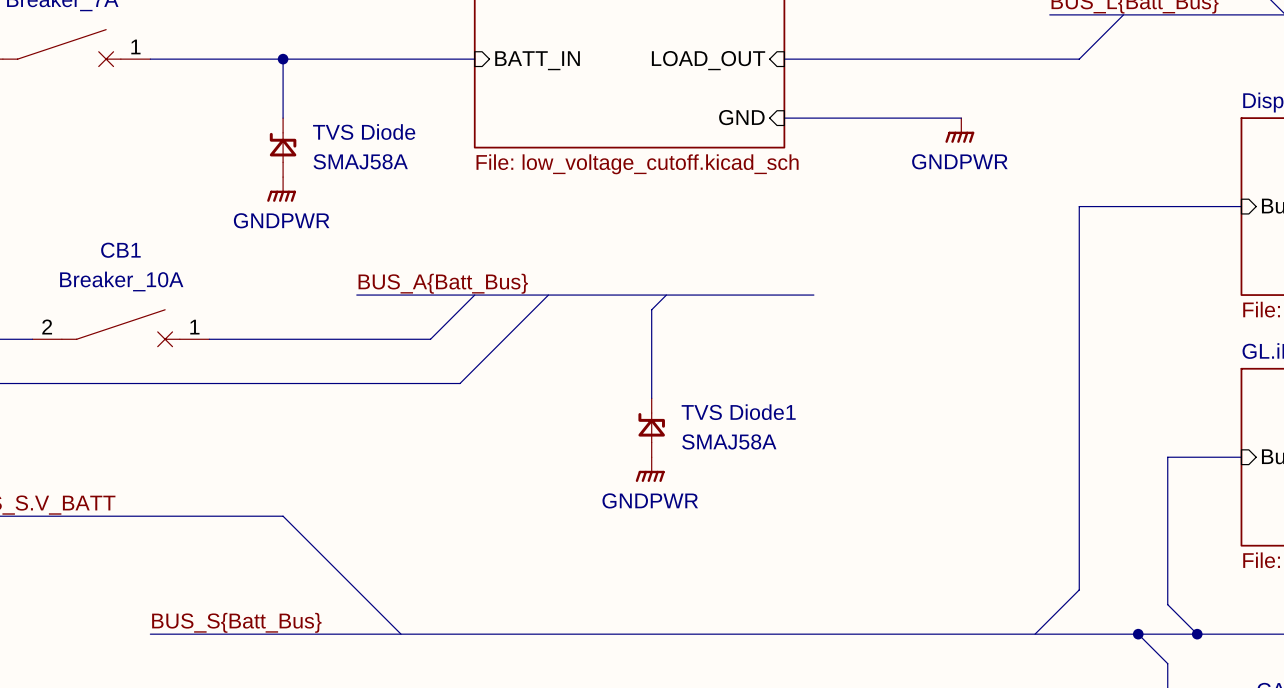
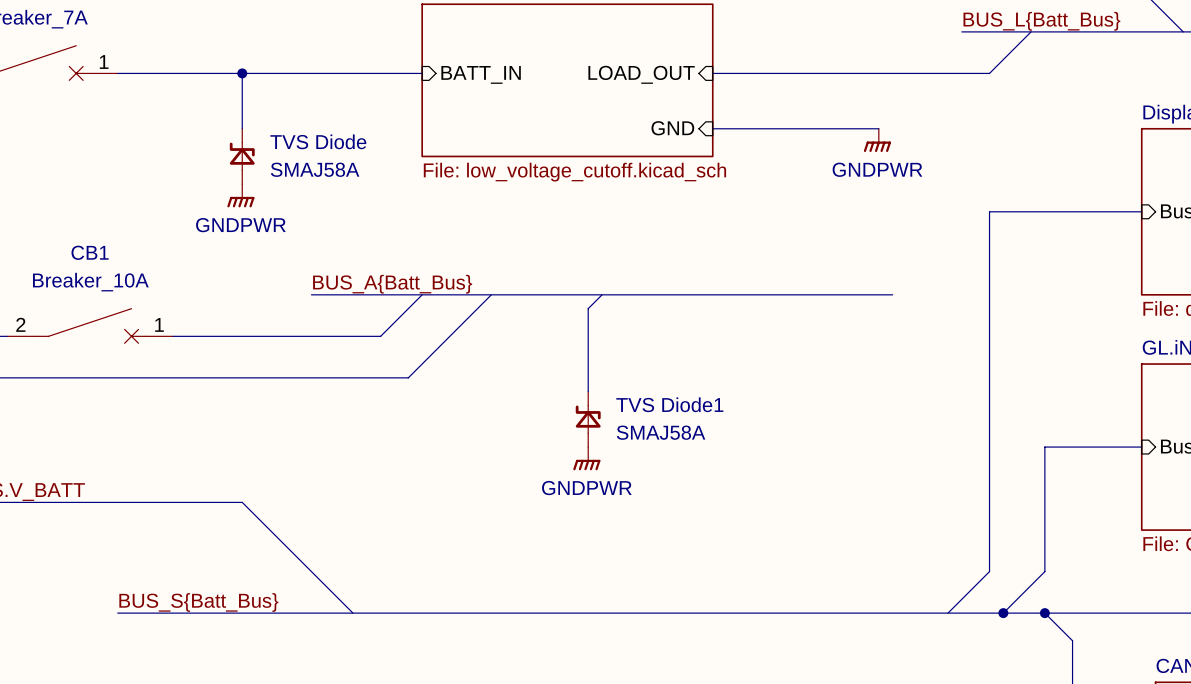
bus: none -> (740, 294) (892, 294)
bus: (1167, 457) (1167, 604) (1197, 634) -> (1072, 447) (1044, 447) (1044, 571) (1003, 613)
junction: none -> (1003, 613)
junction: (1197, 634) -> none

